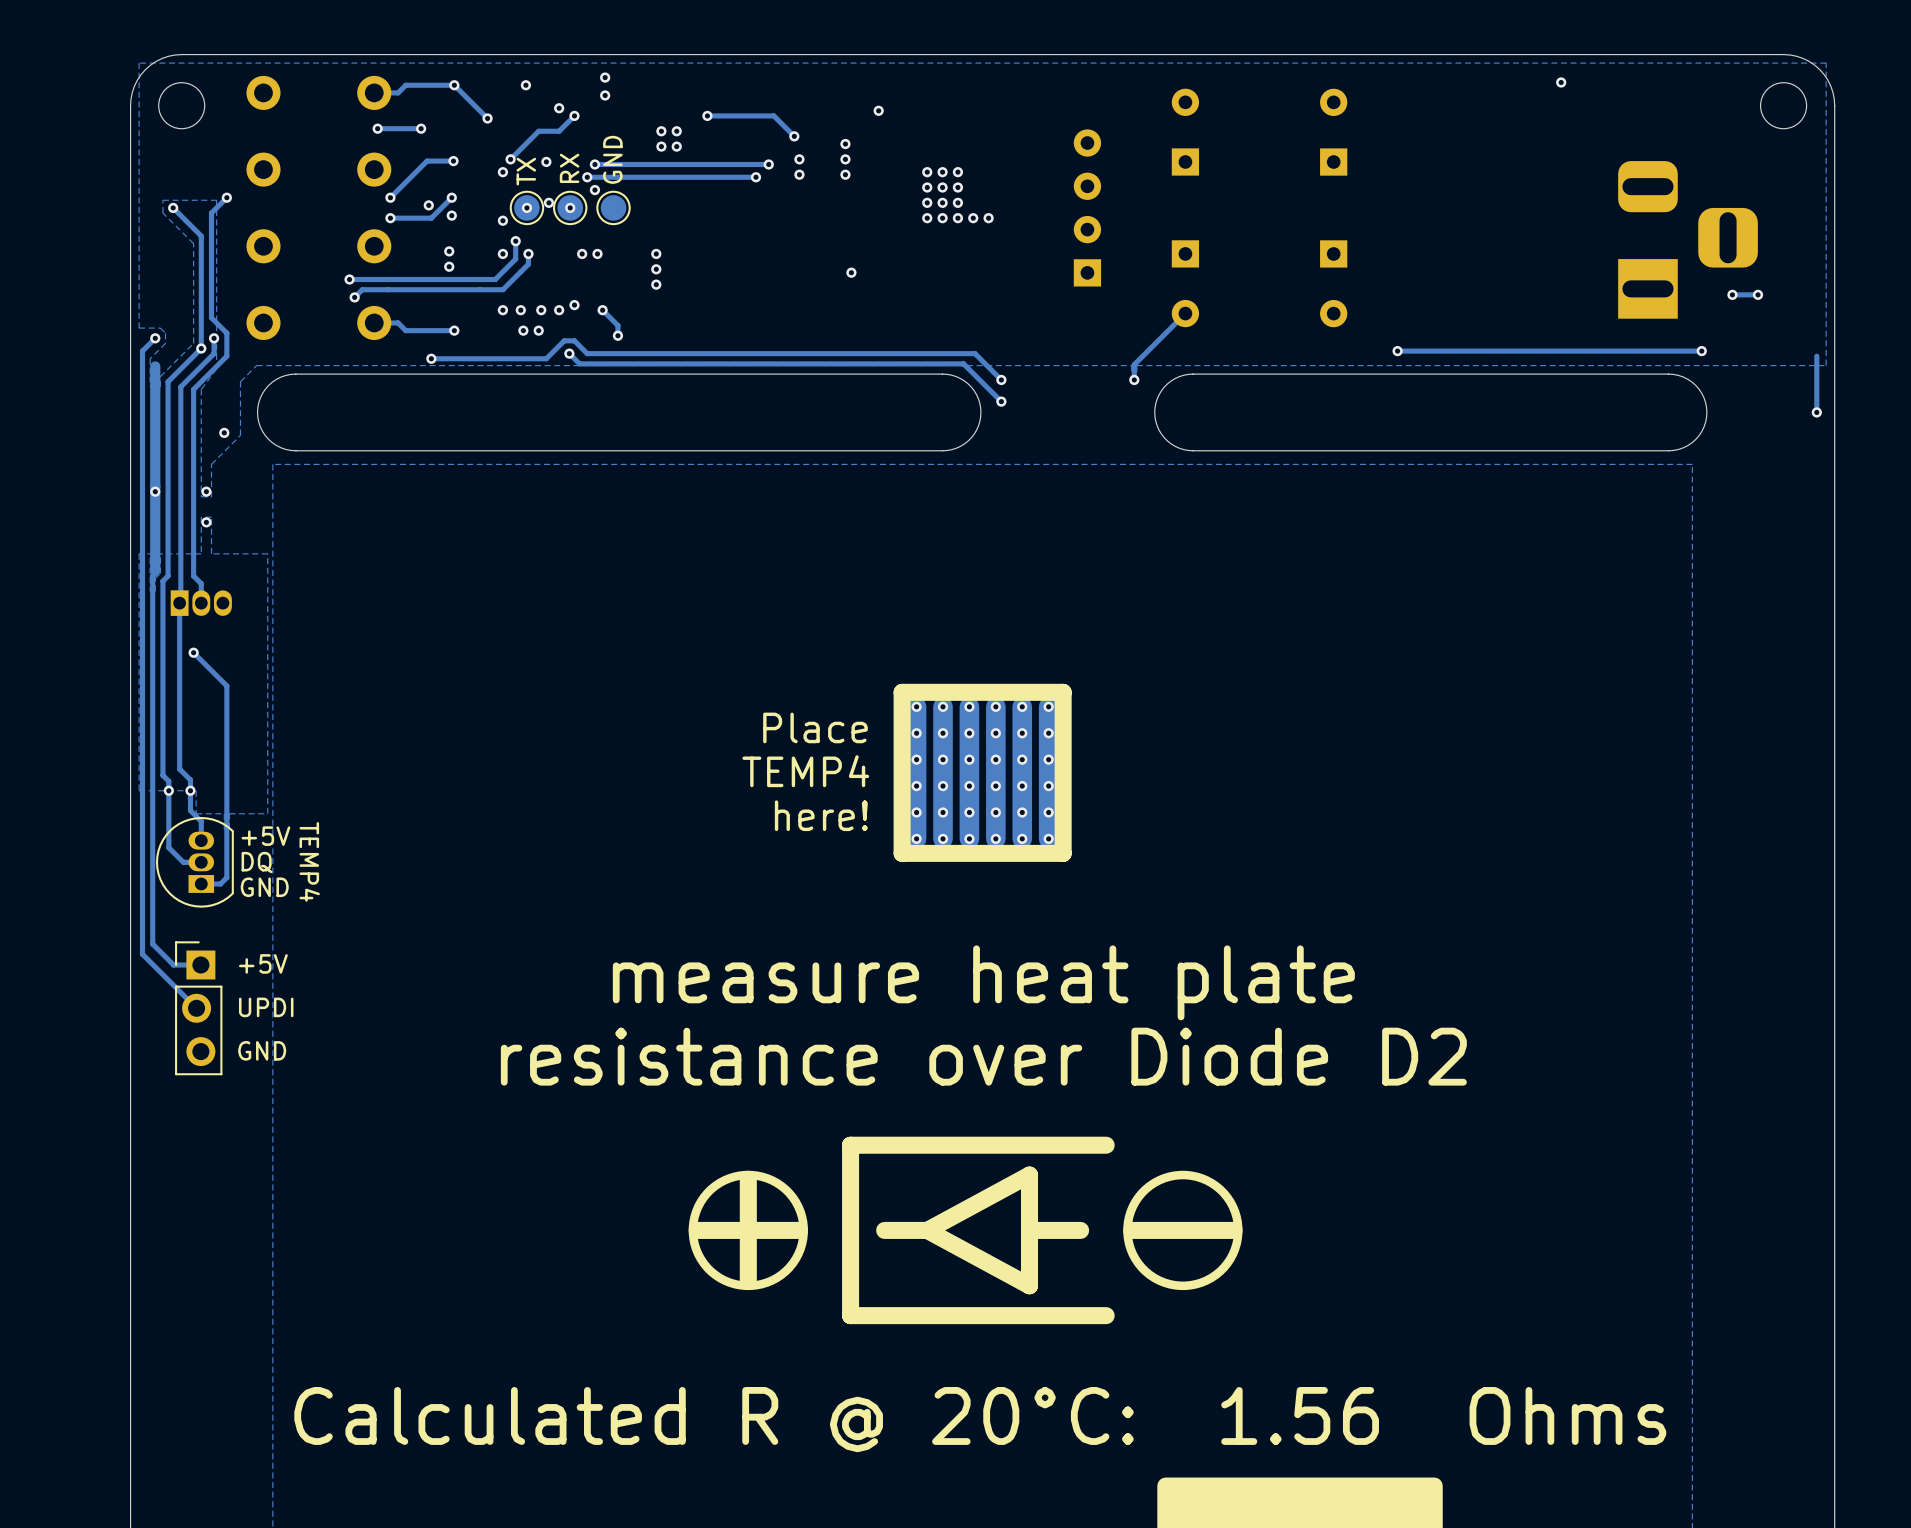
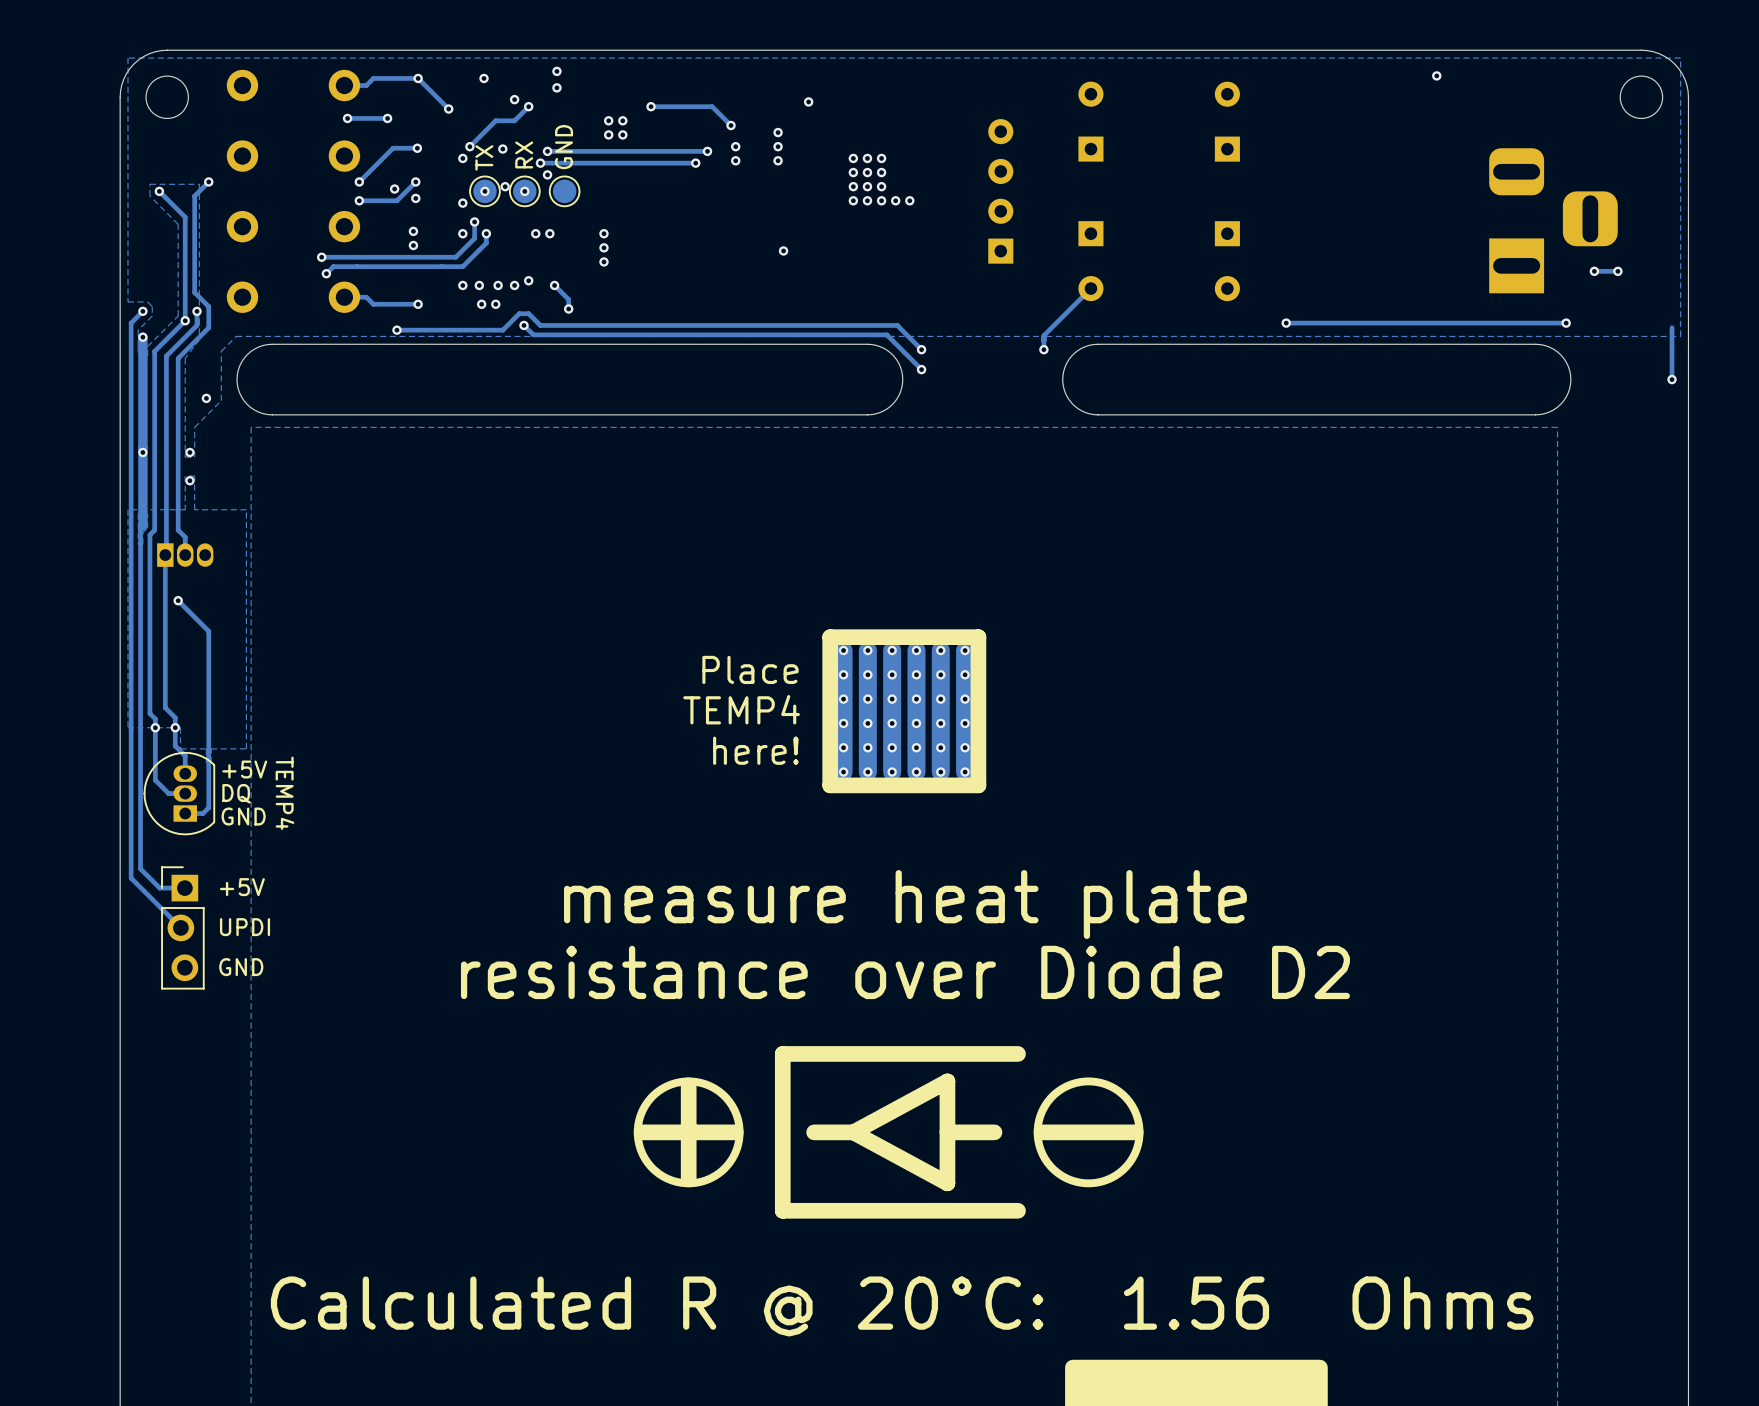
via: none -> (142, 337)

